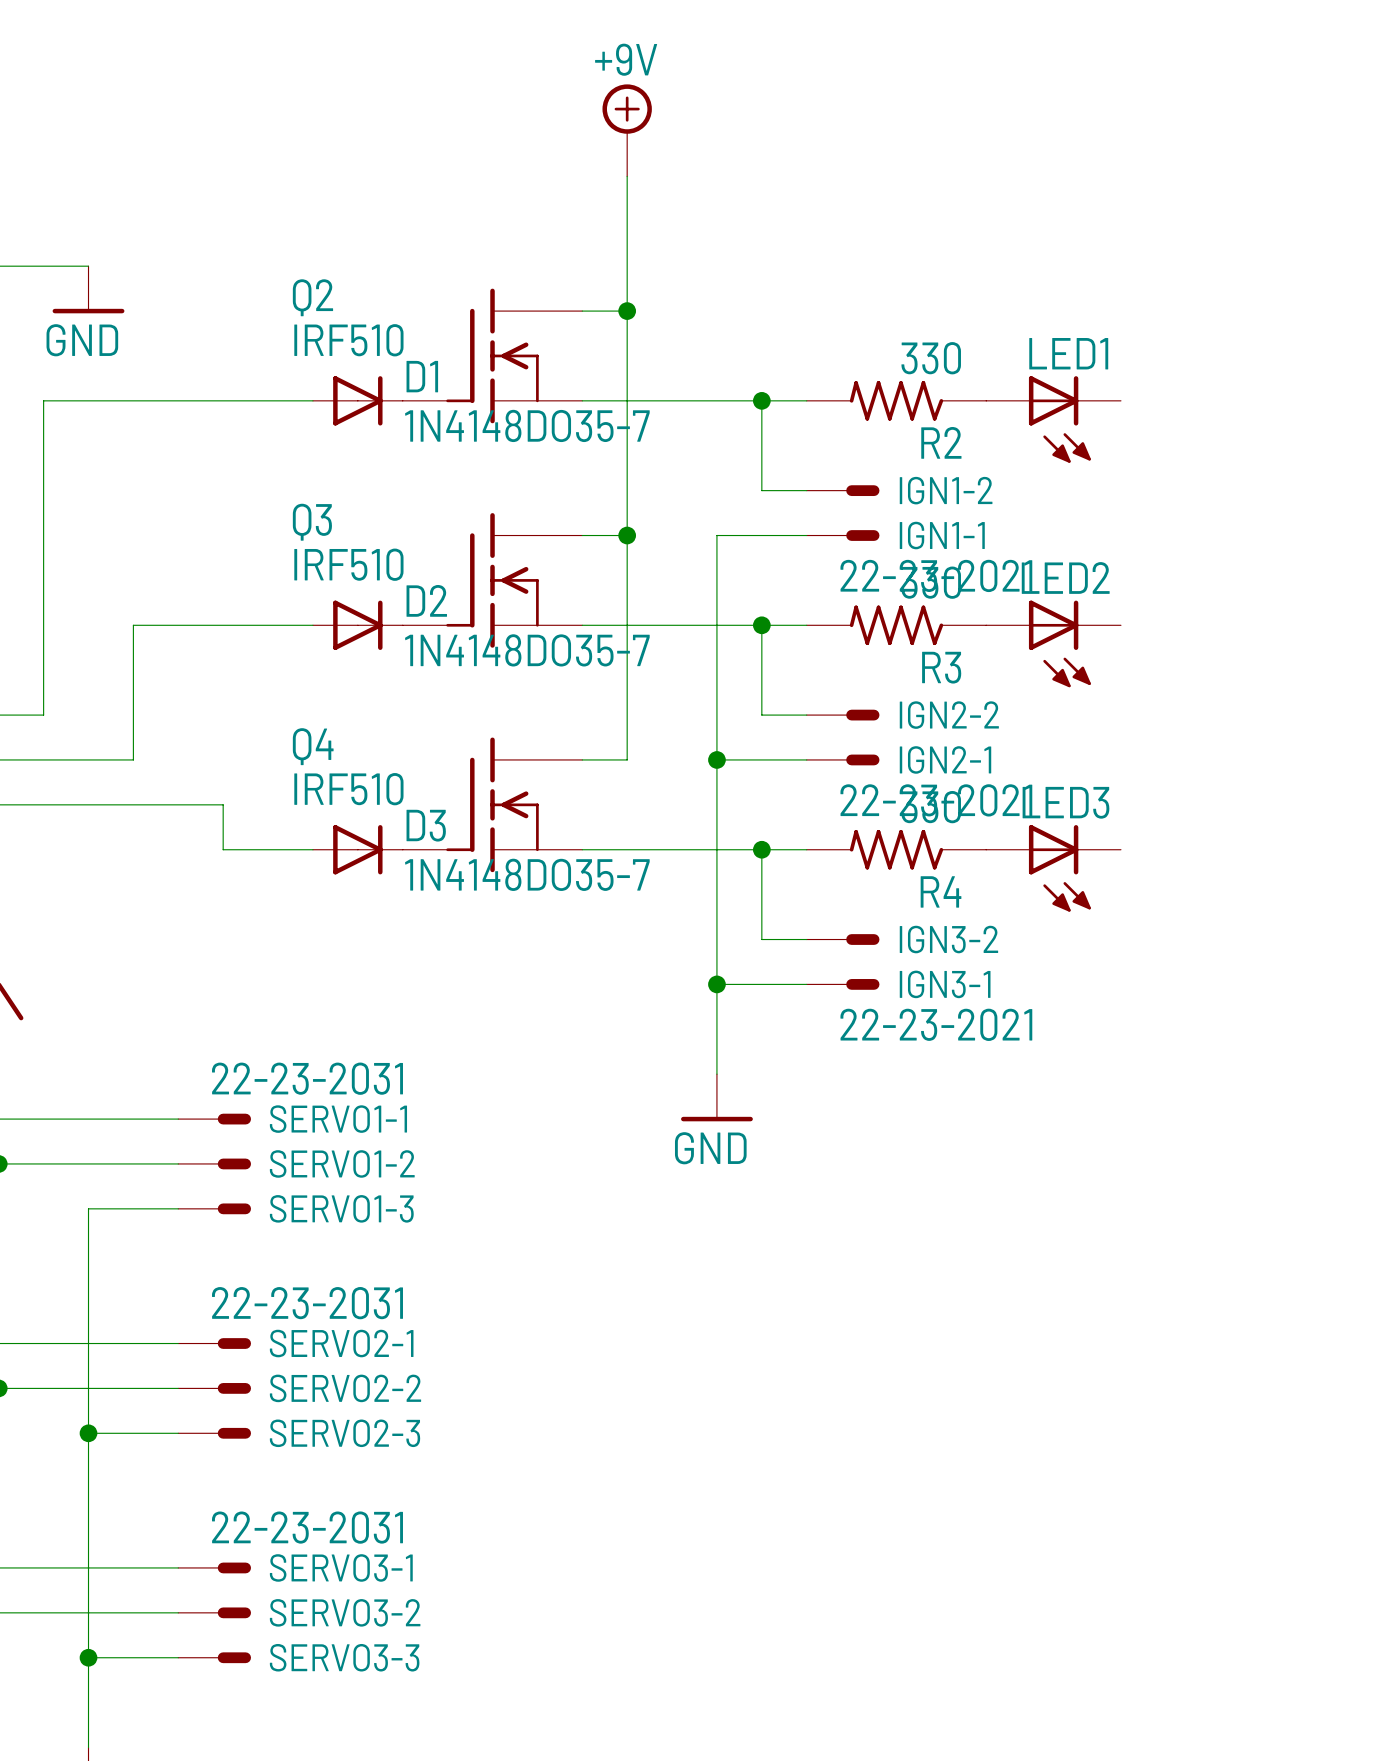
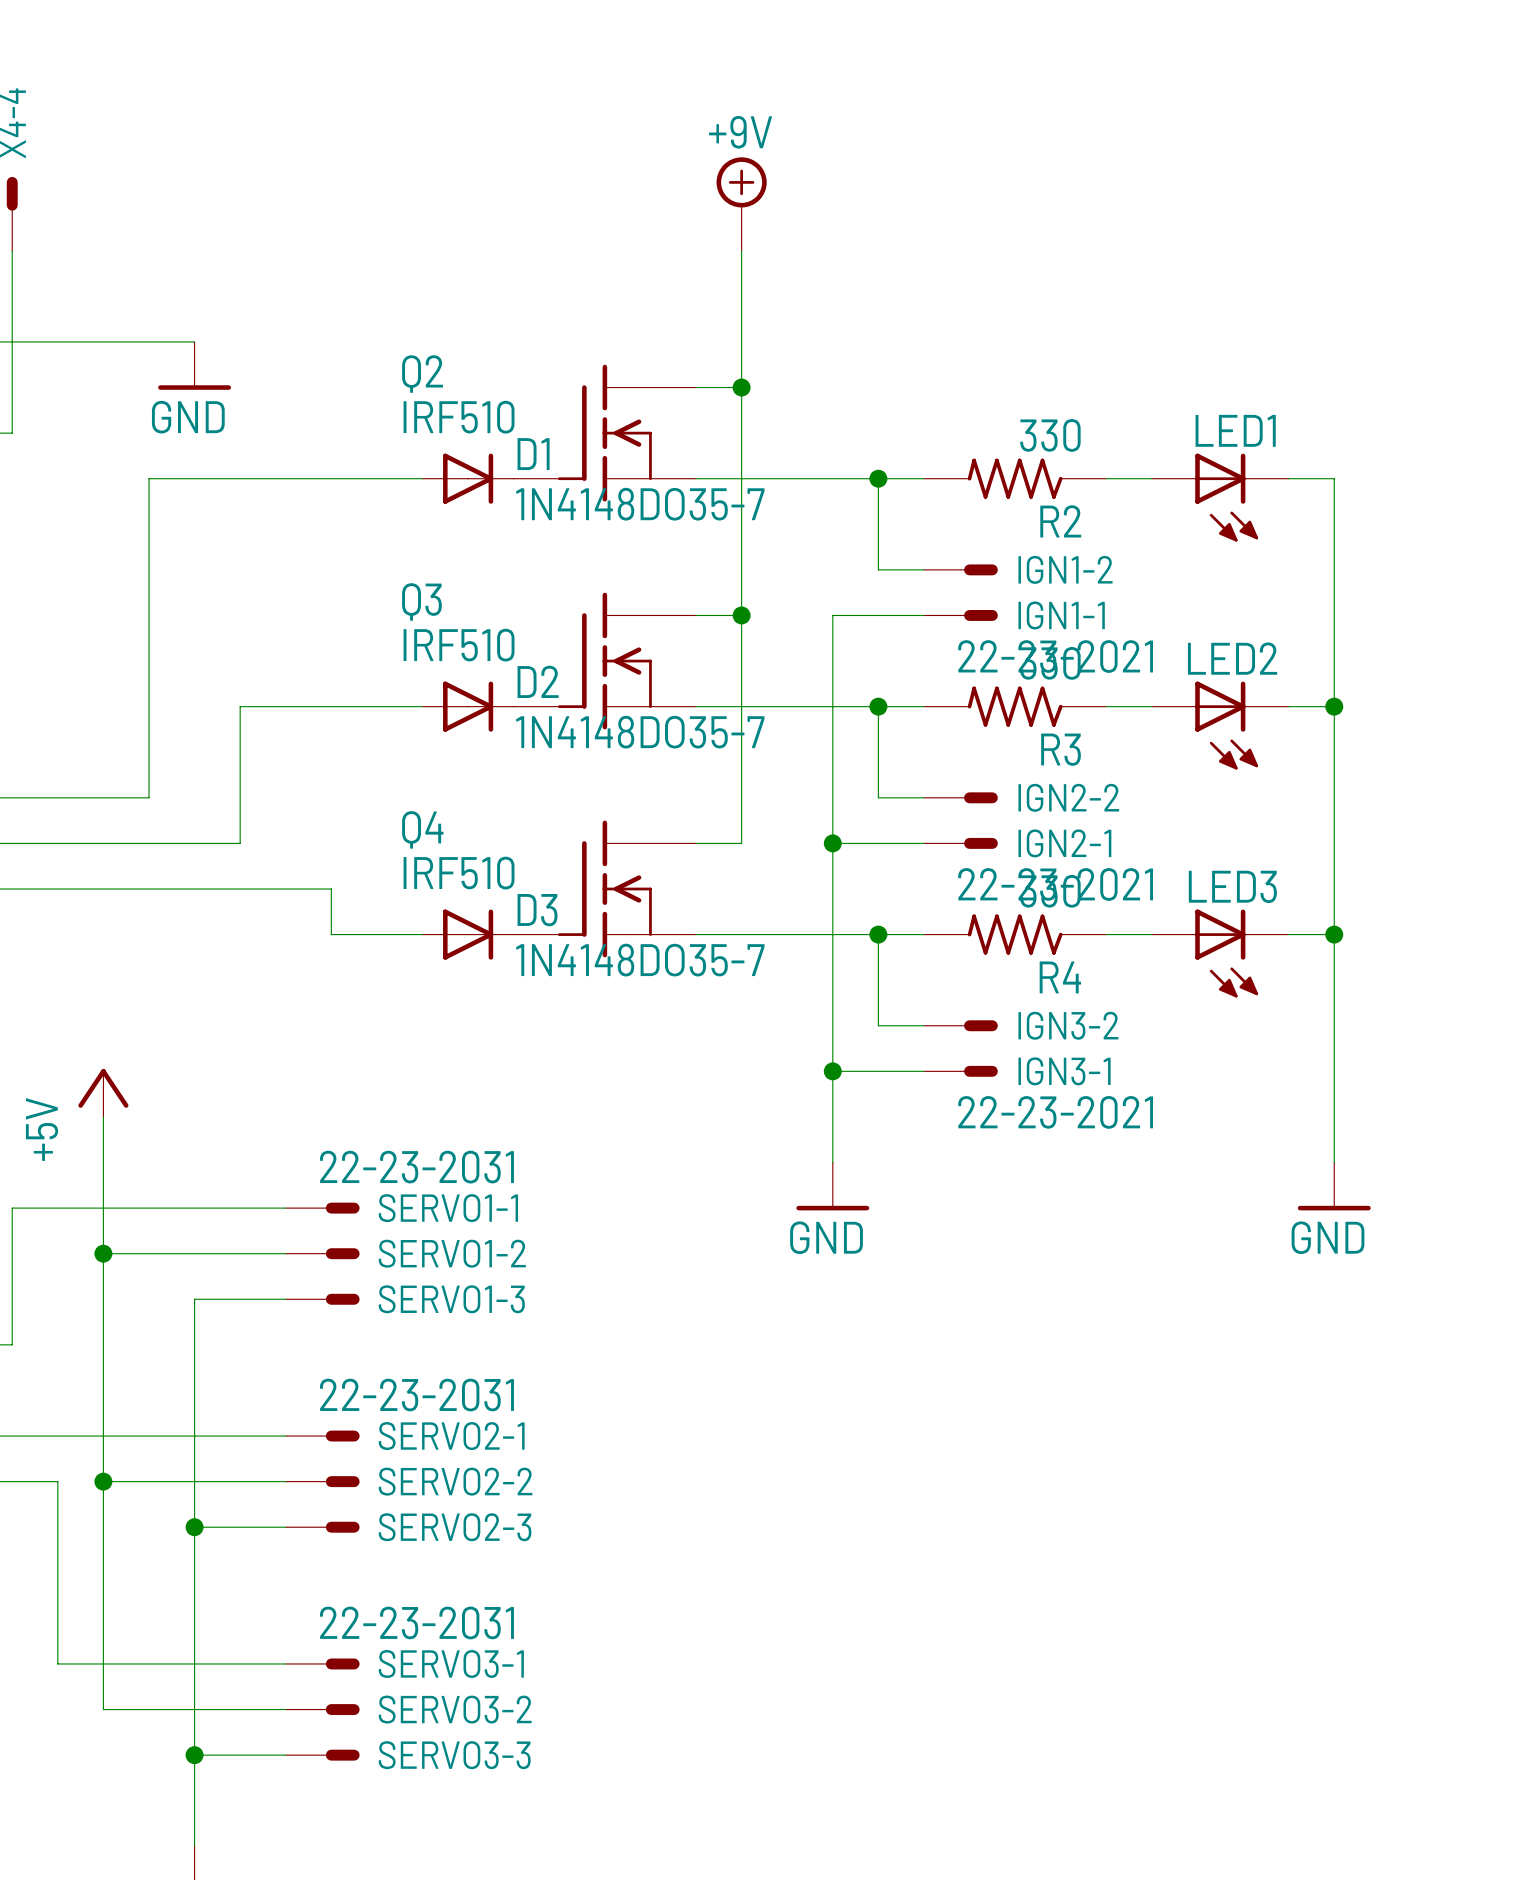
wire: none -> (1288, 478) (1334, 478) (1334, 1162)
LED1 position: (1053, 419) -> (1220, 497)
wire: none -> (1288, 706) (1334, 706)
junction: none -> (1334, 706)
LED2 position: (1053, 643) -> (1220, 725)
wire: none -> (1288, 934) (1334, 934)
junction: none -> (1334, 934)
LED3 position: (1053, 868) -> (1220, 953)
power symbol: none -> GND (1334, 1186)

